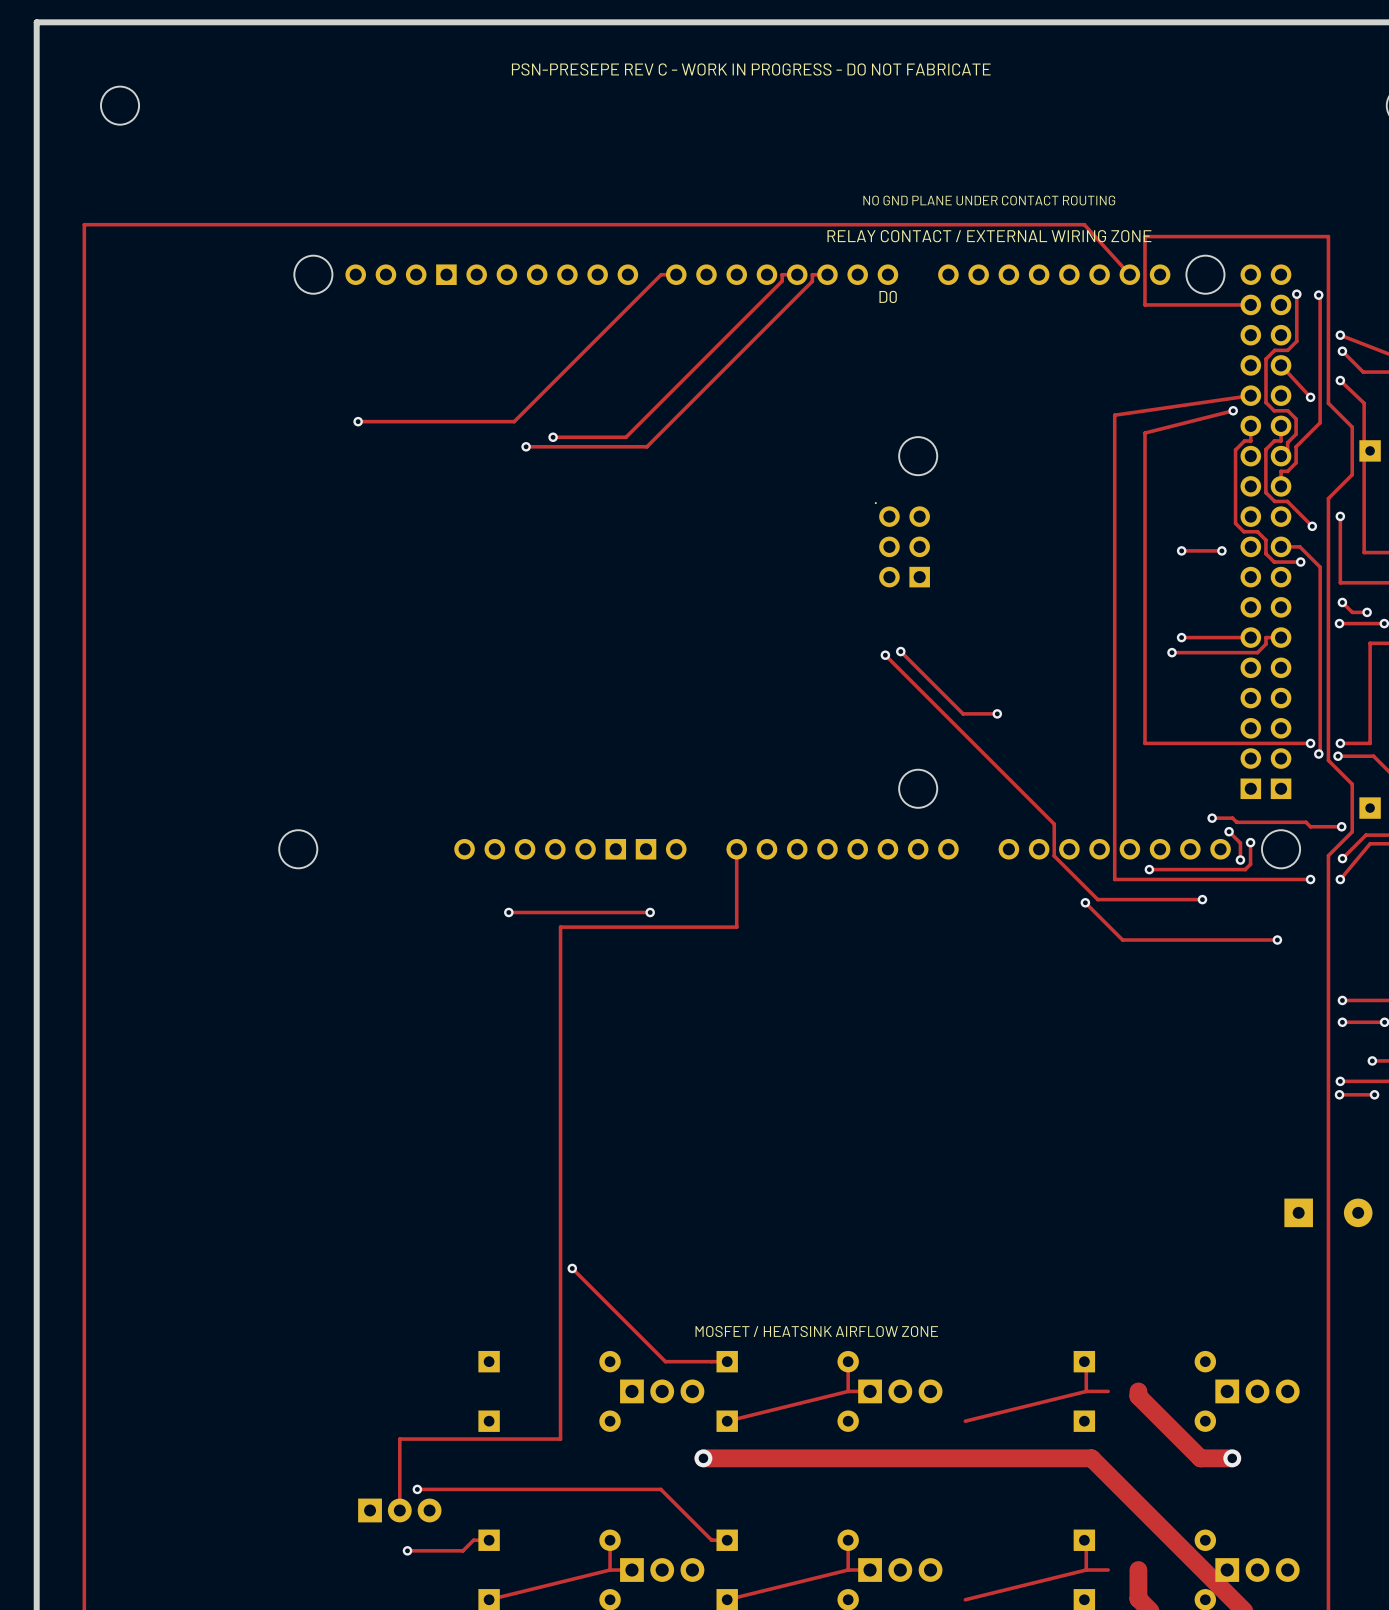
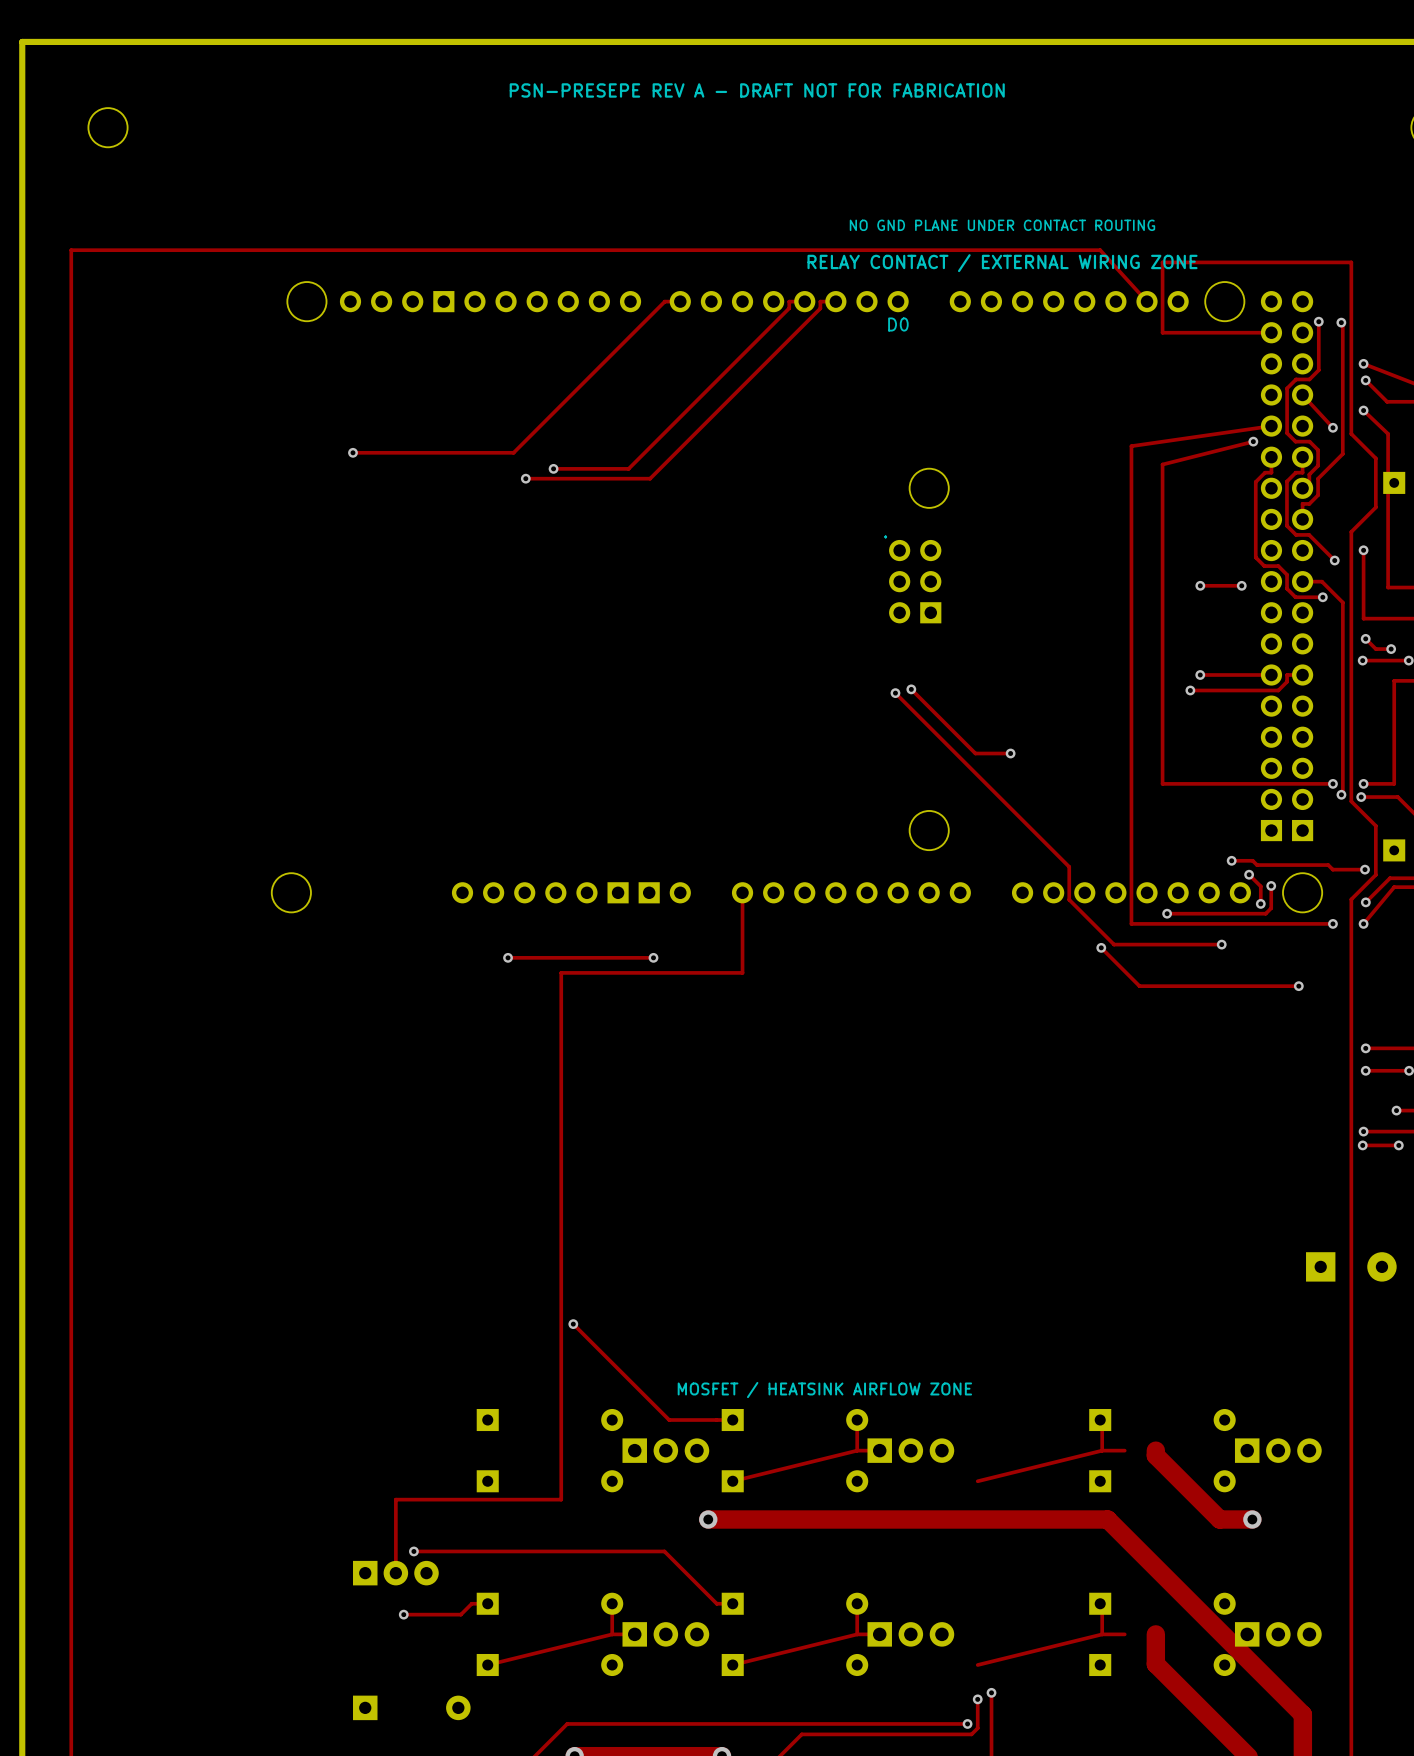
text: PSN-PRESEPE REV C - WORK IN PROGRESS - DO NOT FABRICATE (751, 69) -> PSN-PRESEPE REV A - DRAFT NOT FOR FABRICATION (757, 90)

